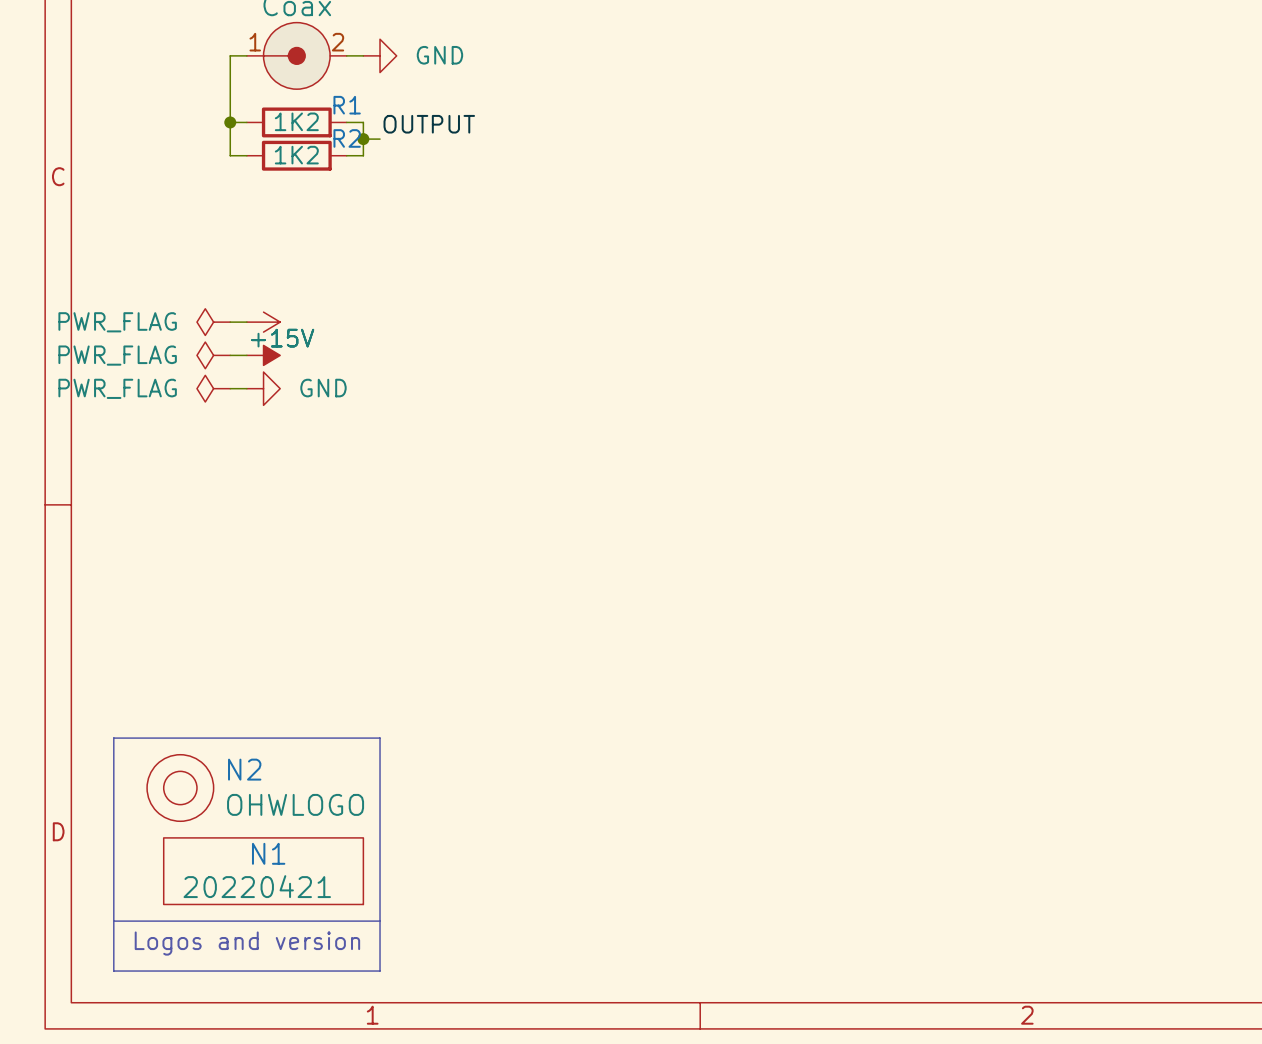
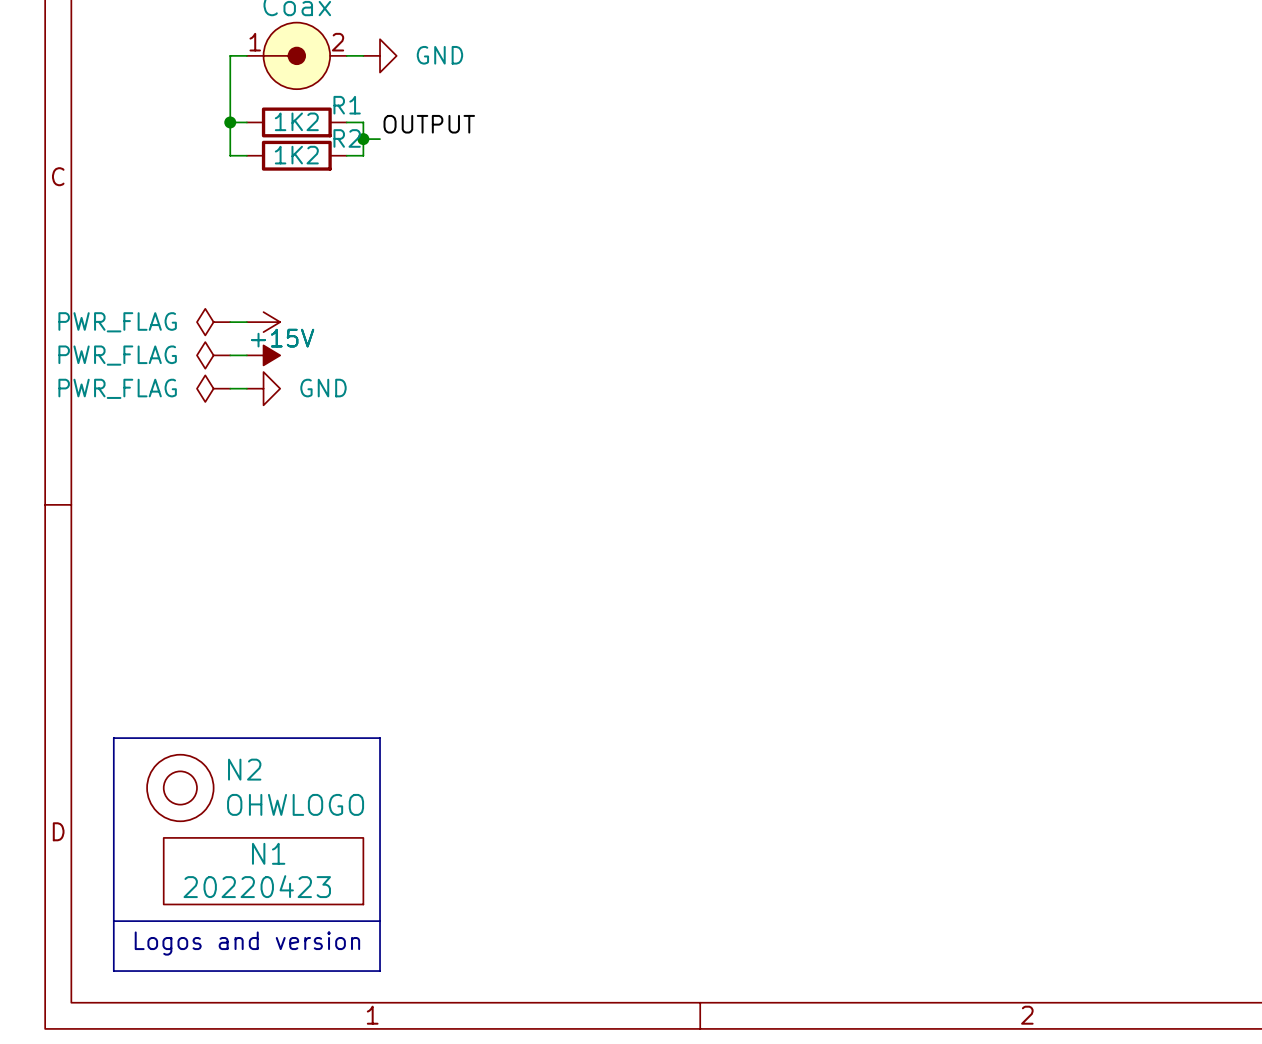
N1 value: 20220421 (257, 886) -> 20220423 (257, 886)

